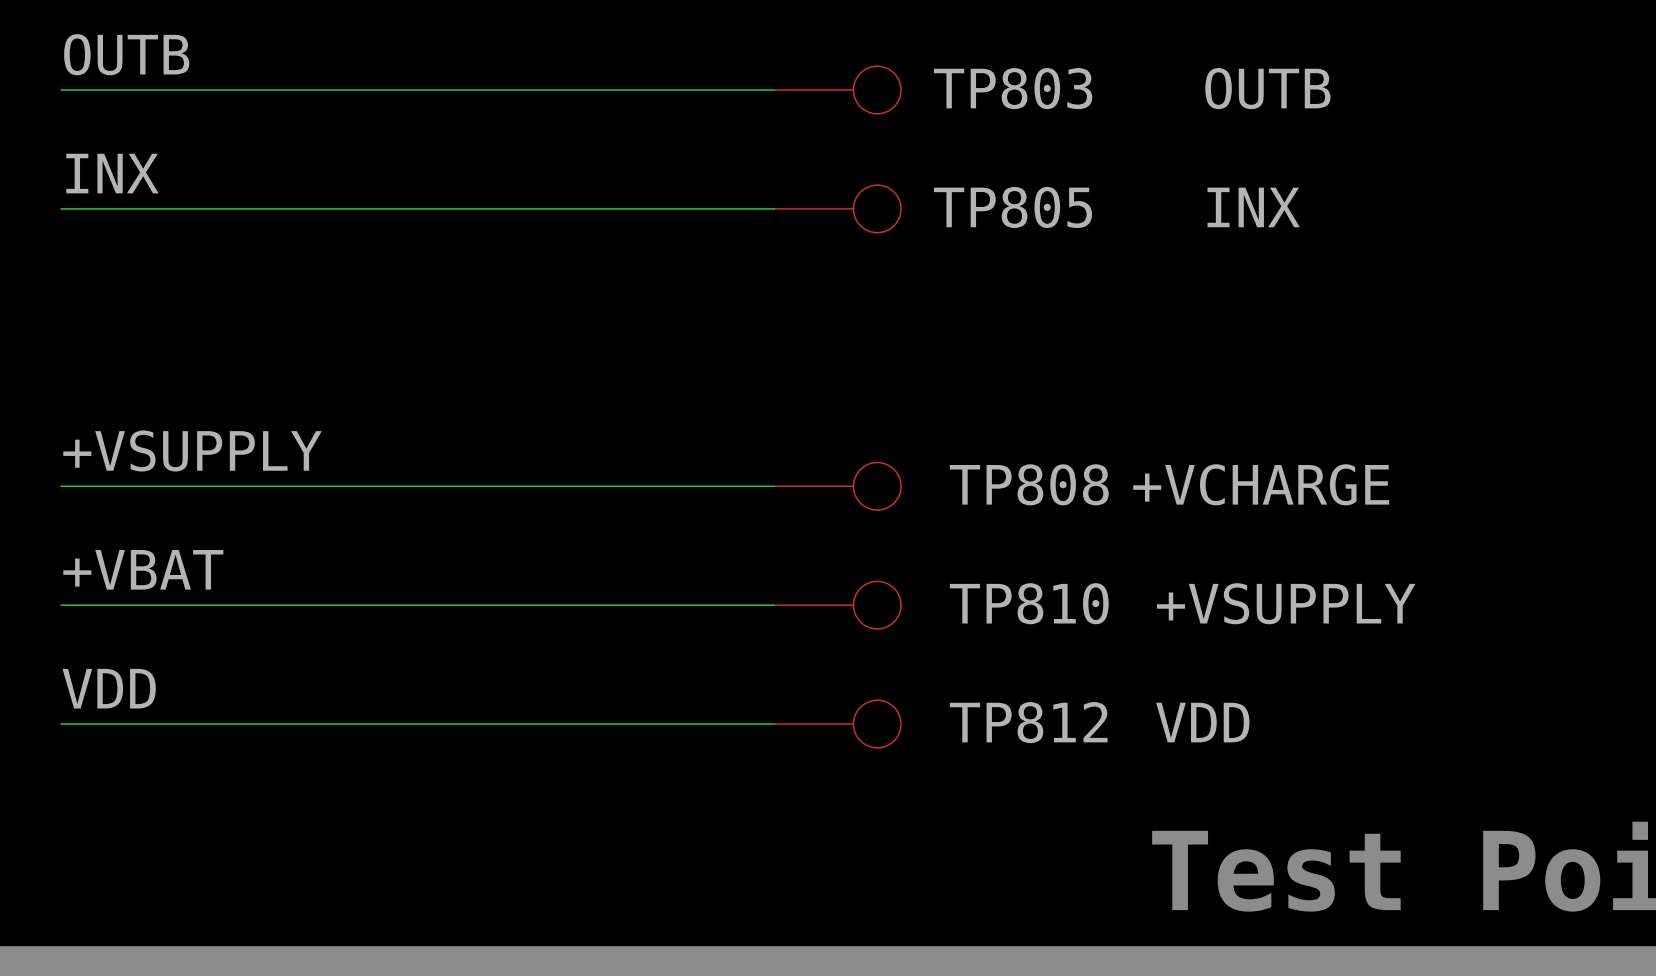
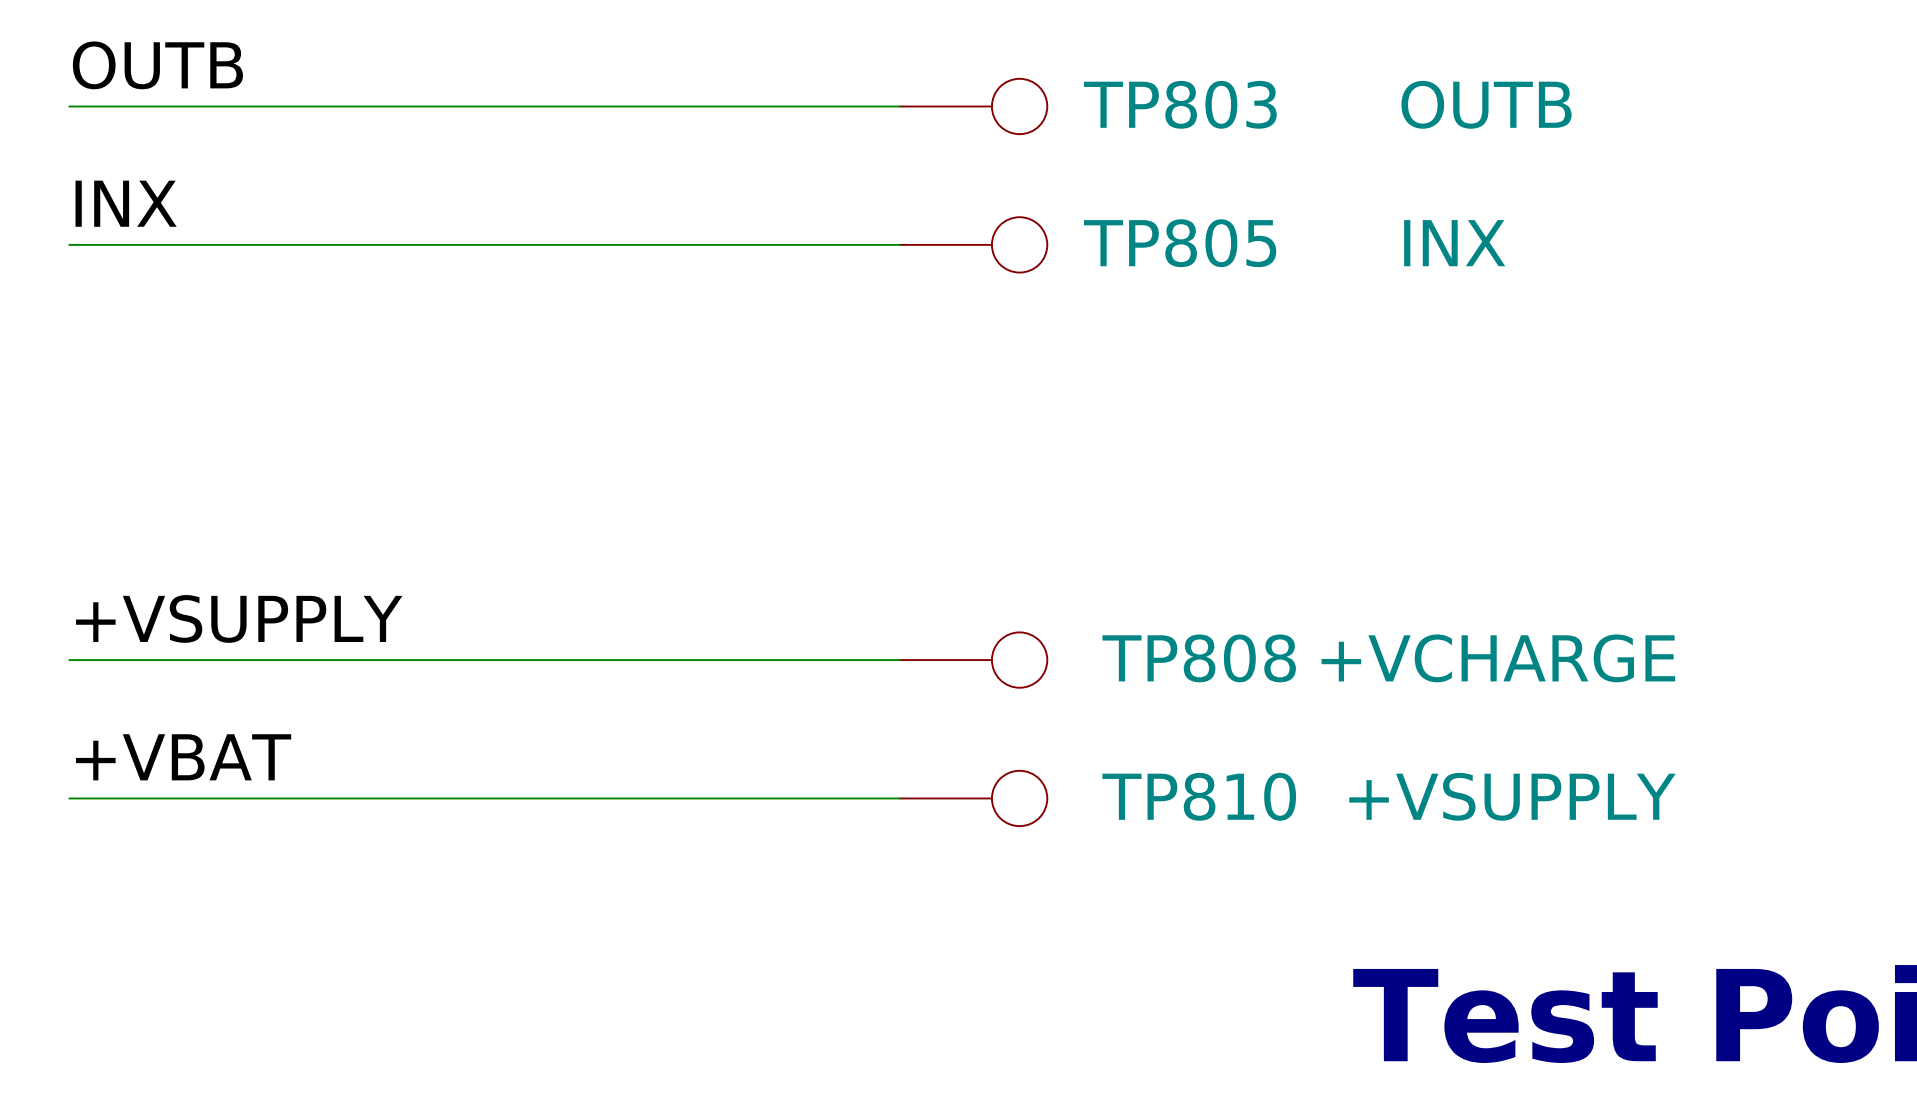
label position: +VSUPPLY (192, 450) -> +VSUPPLY (239, 618)
wire: (60, 486) (774, 486) -> none
TP808 position: (837, 486) -> (973, 660)
label position: +VBAT (143, 569) -> +VBAT (183, 757)
wire: (60, 605) (774, 605) -> (69, 660) (899, 660)
TP810 position: (837, 605) -> (973, 798)
label: VDD (109, 688) -> none
wire: (60, 724) (774, 724) -> (69, 798) (899, 798)
TP812: VDD (837, 724) -> none

